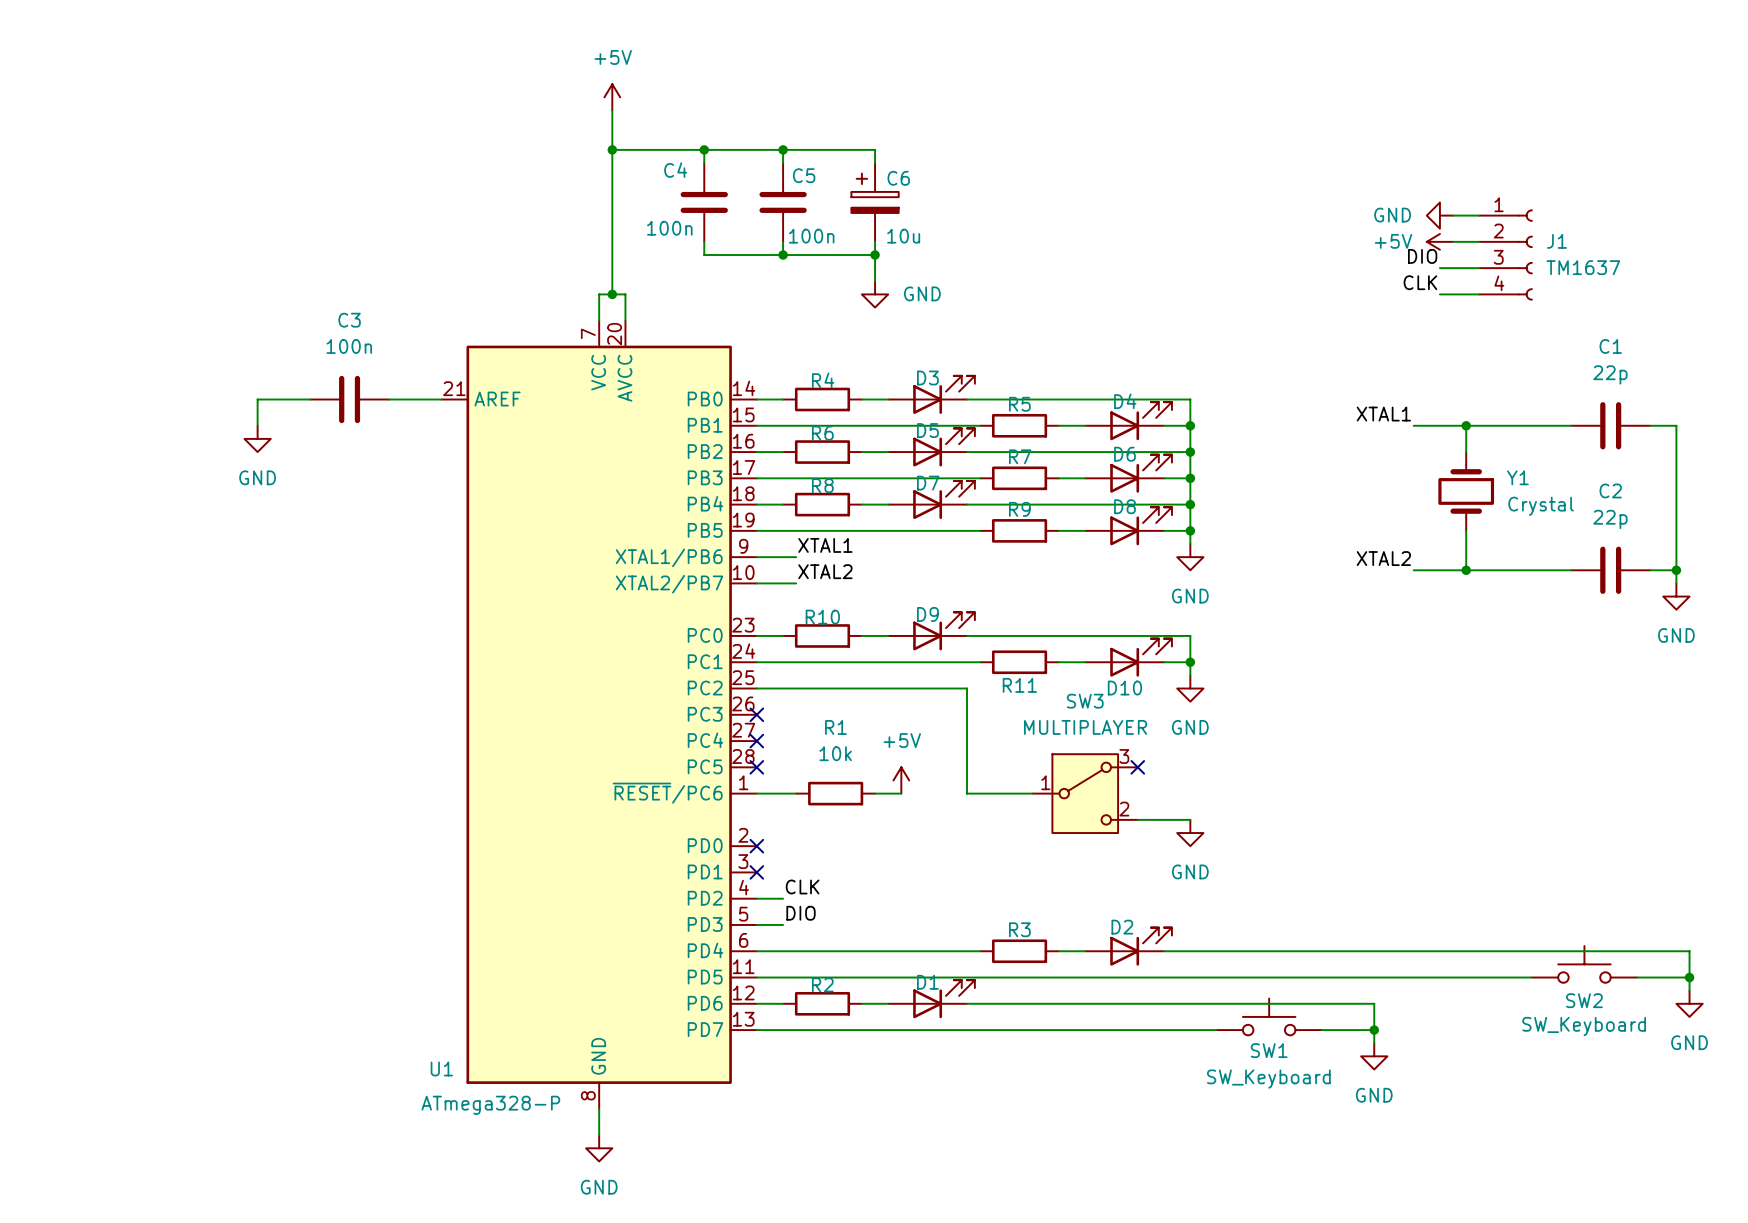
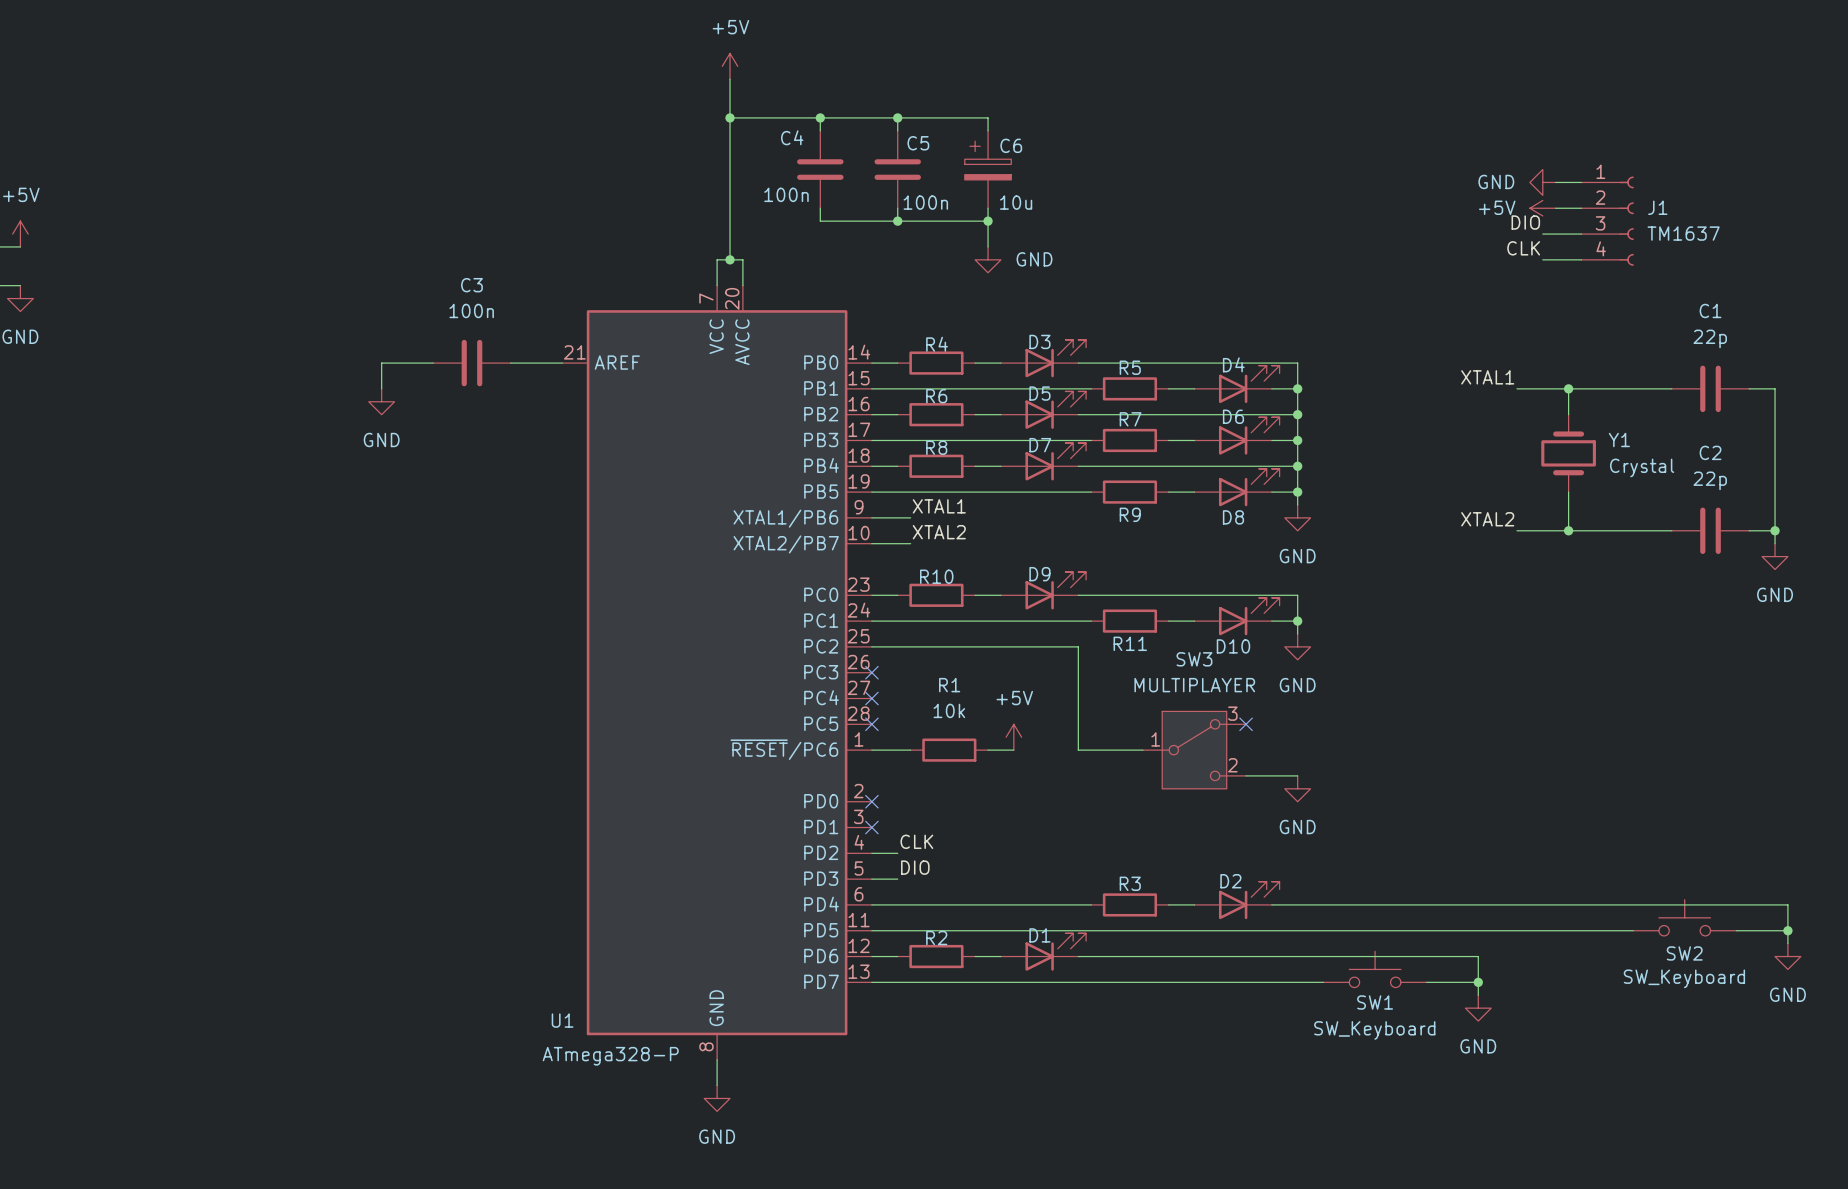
D8 name position: D8 (1124, 506) -> D8 (1233, 517)
R9 name position: R9 (1019, 509) -> R9 (1130, 514)

